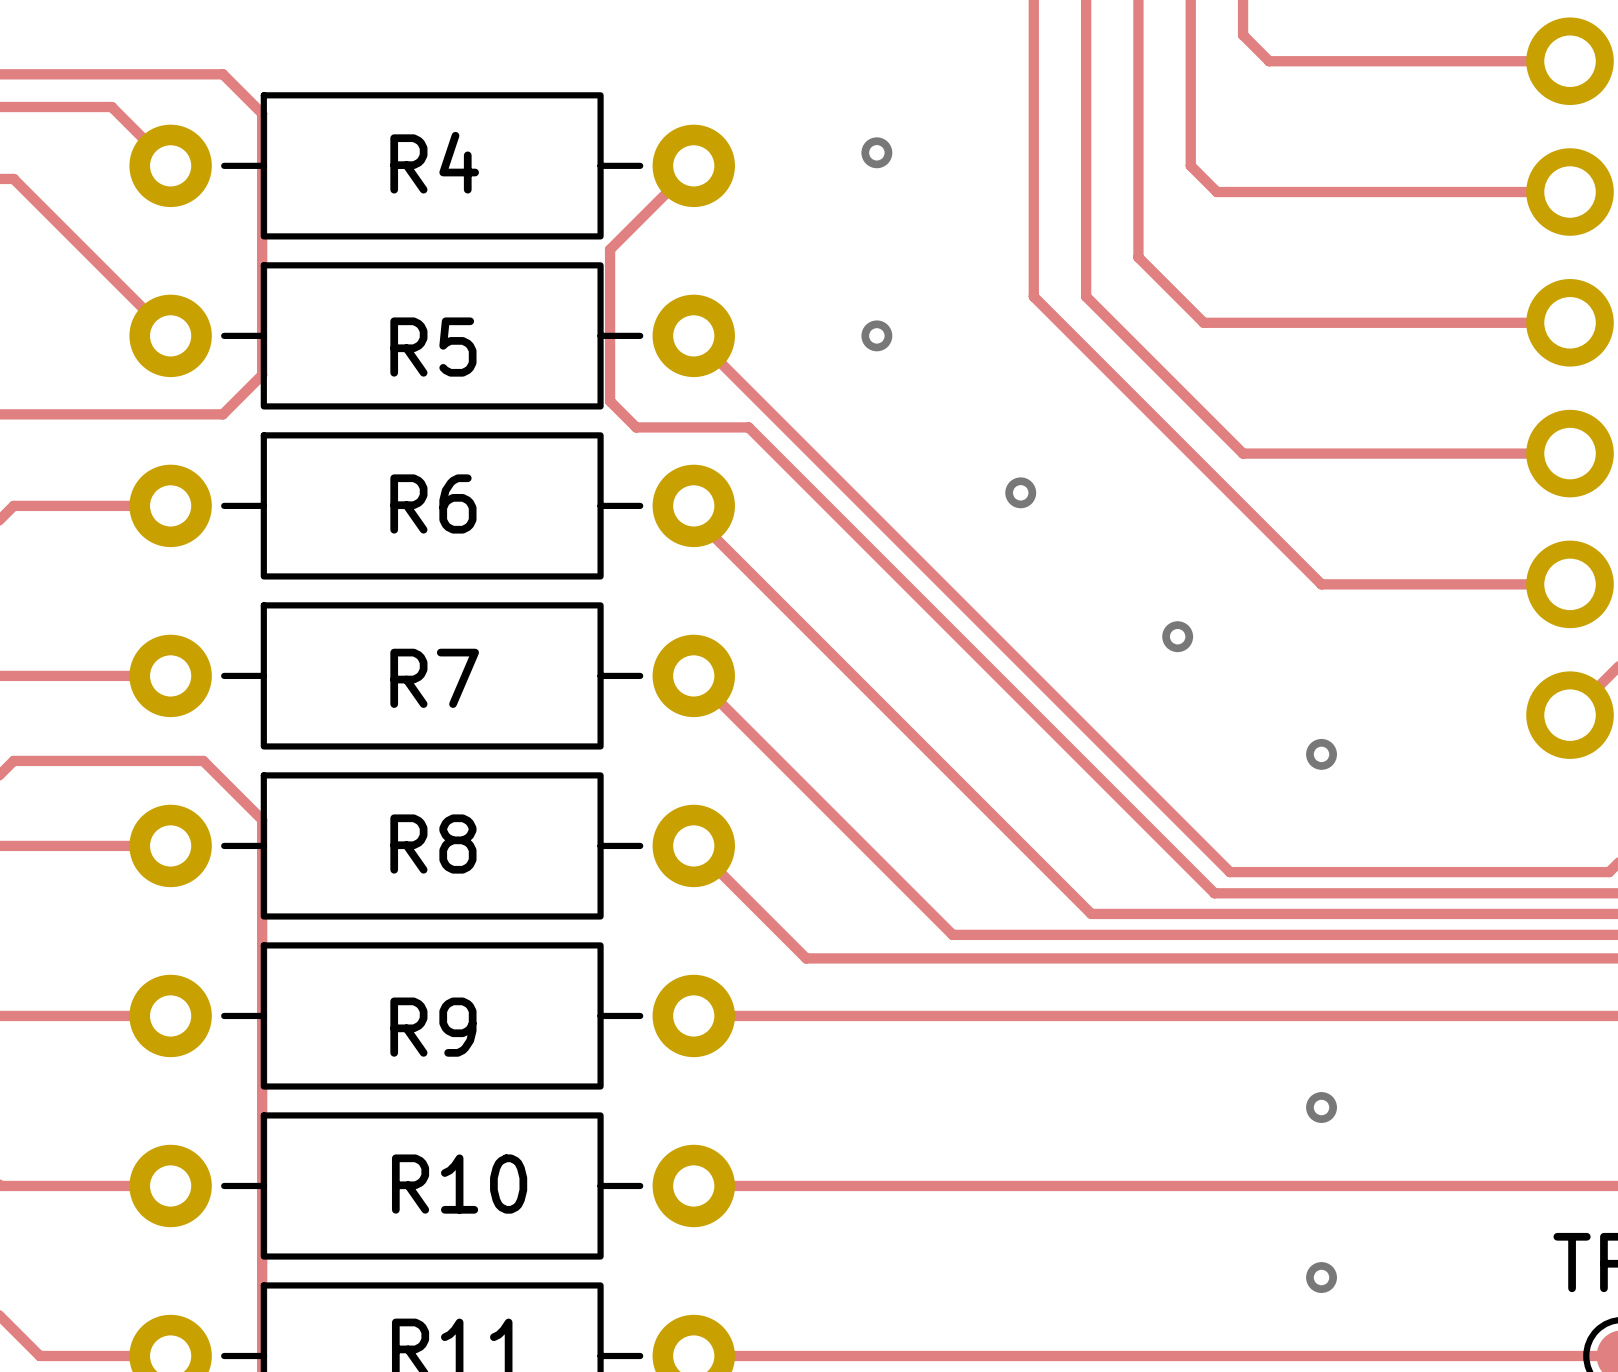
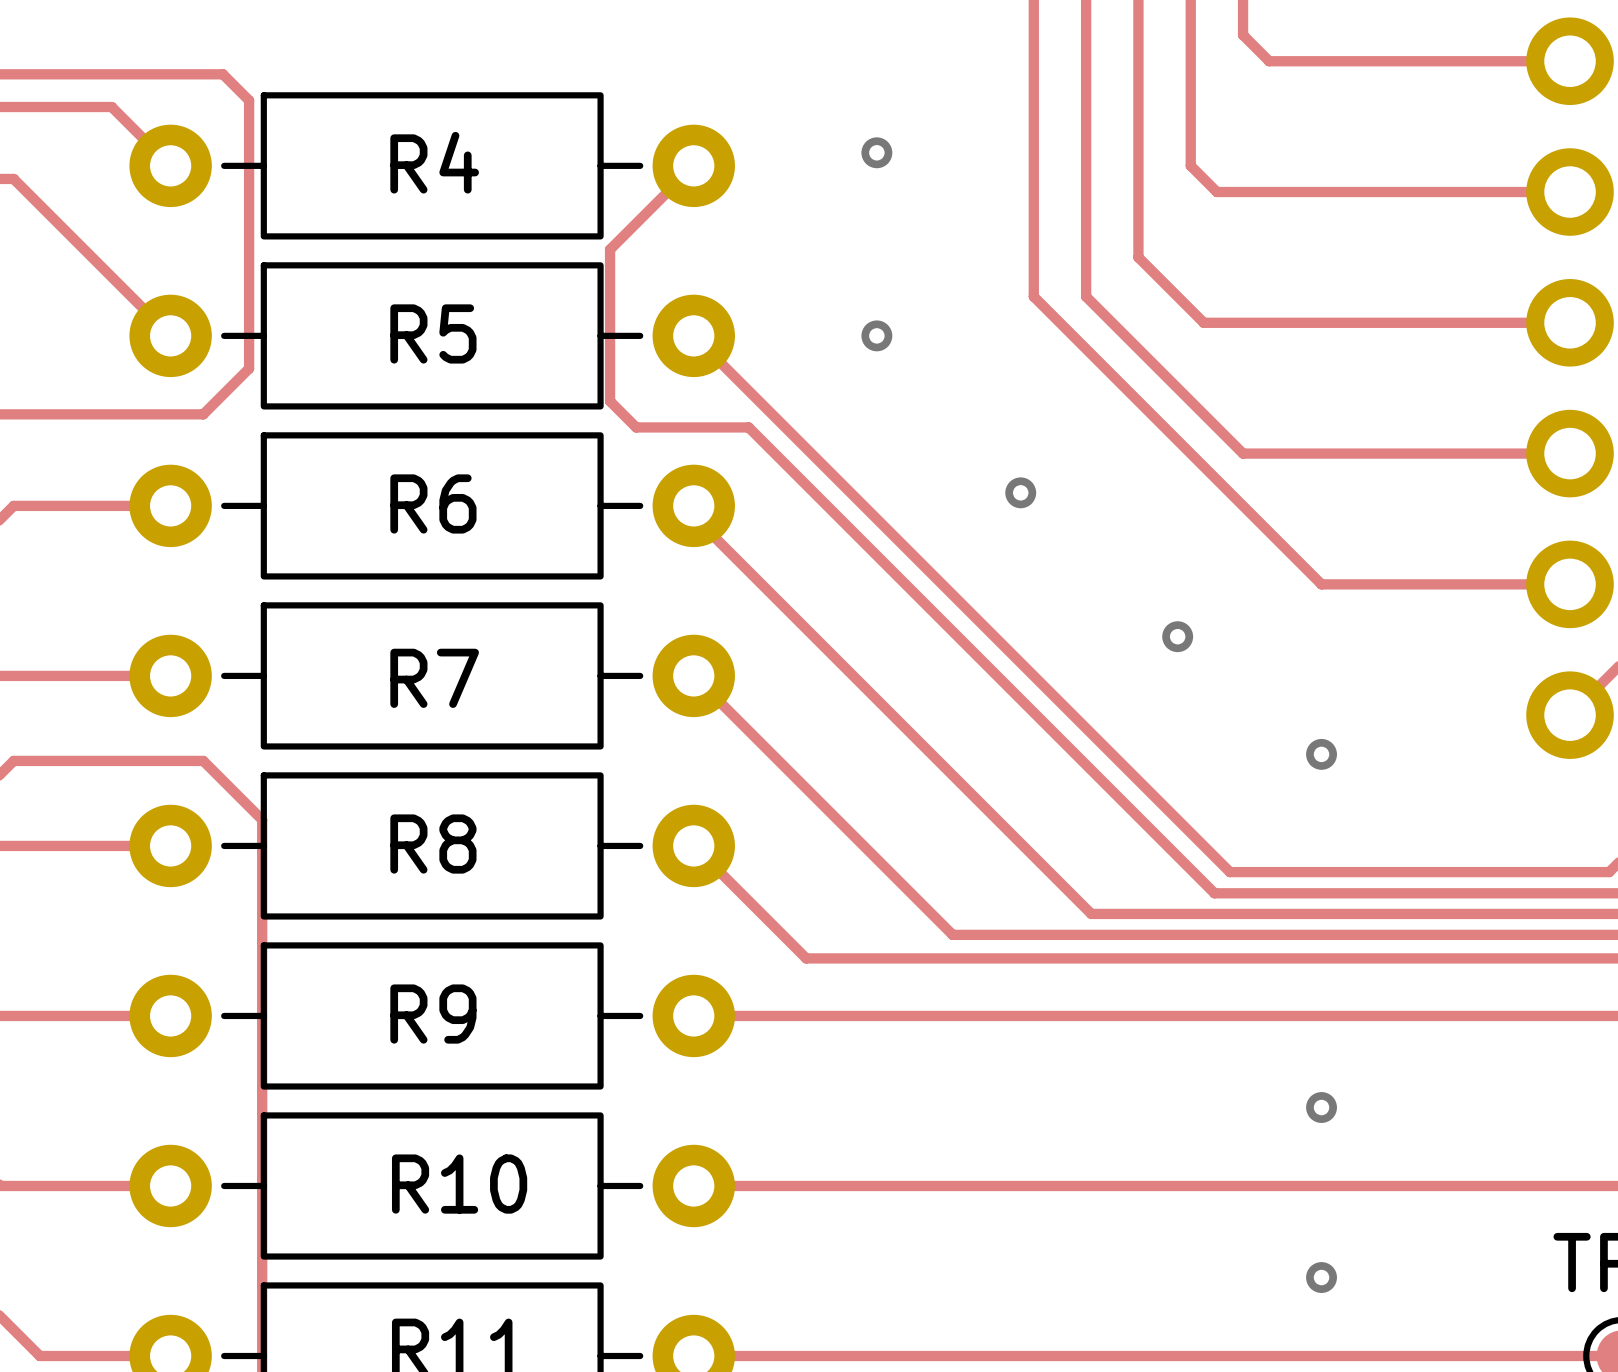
top track: (249, 100) (262, 113) (262, 375) (222, 414) (203, 414) -> (249, 100) (249, 368) (203, 414)
R5 name position: R5 (433, 347) -> R5 (433, 333)
R9 name position: R9 (433, 1027) -> R9 (433, 1014)

